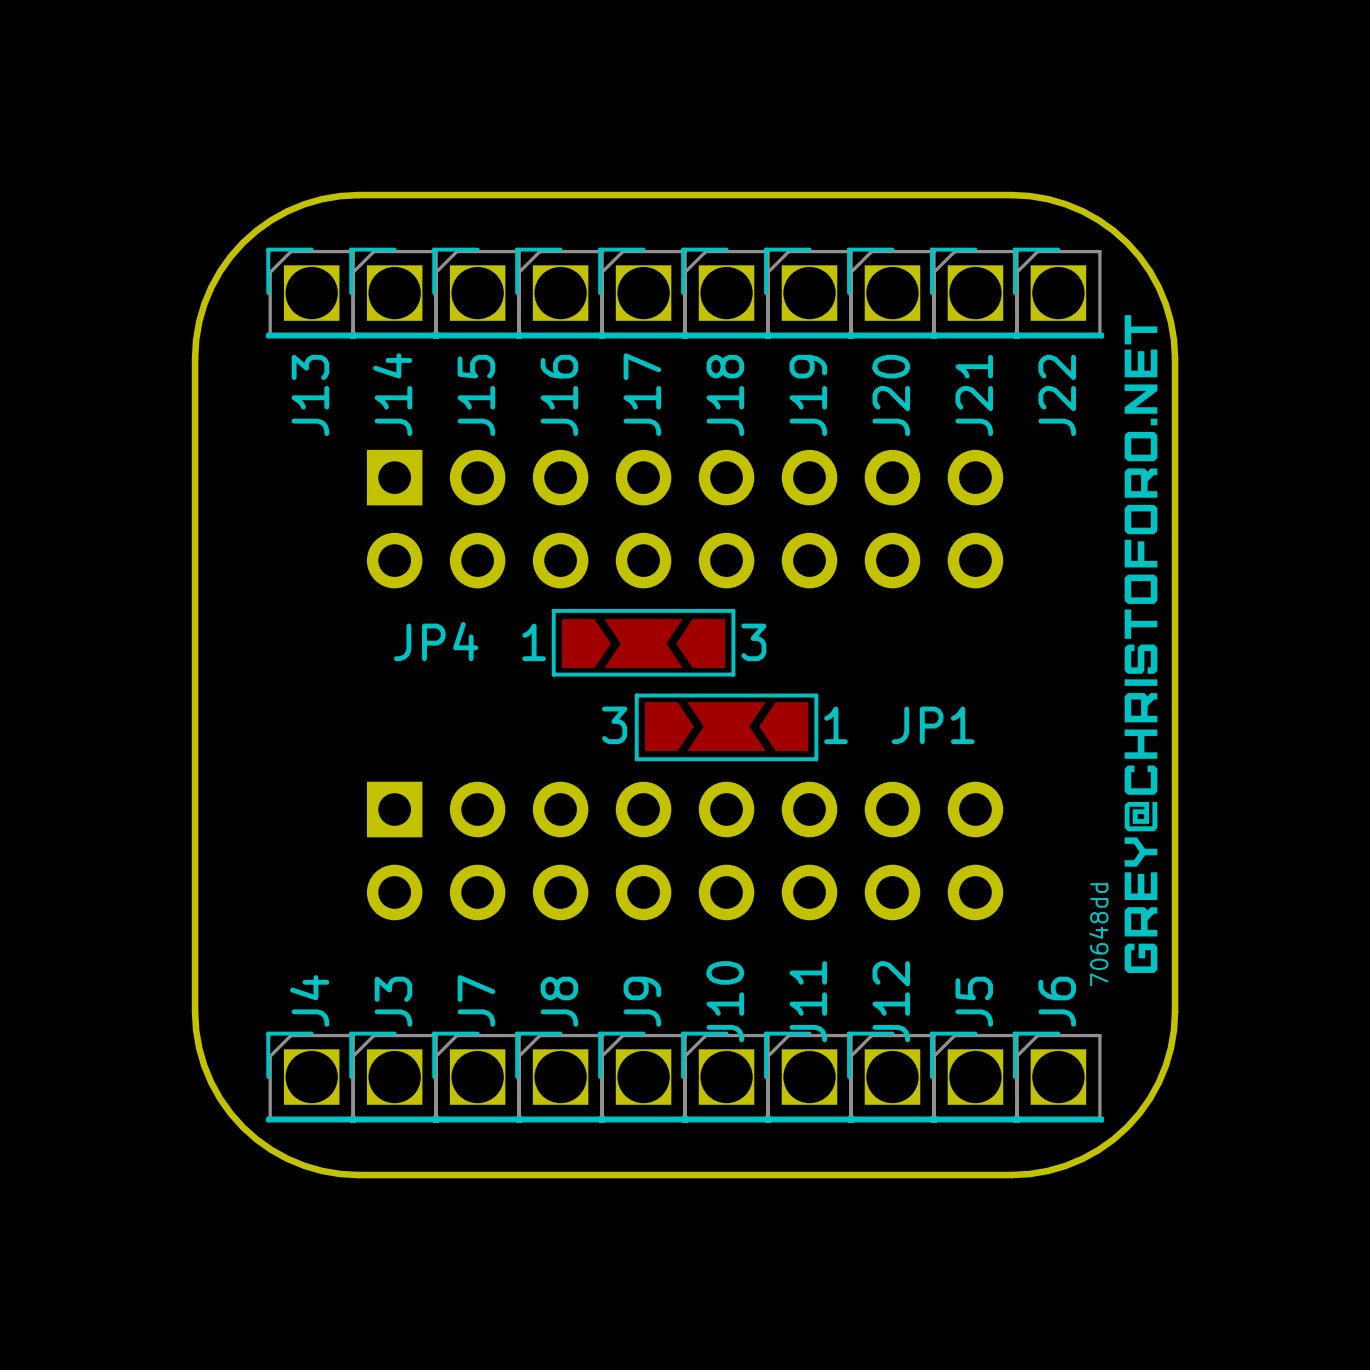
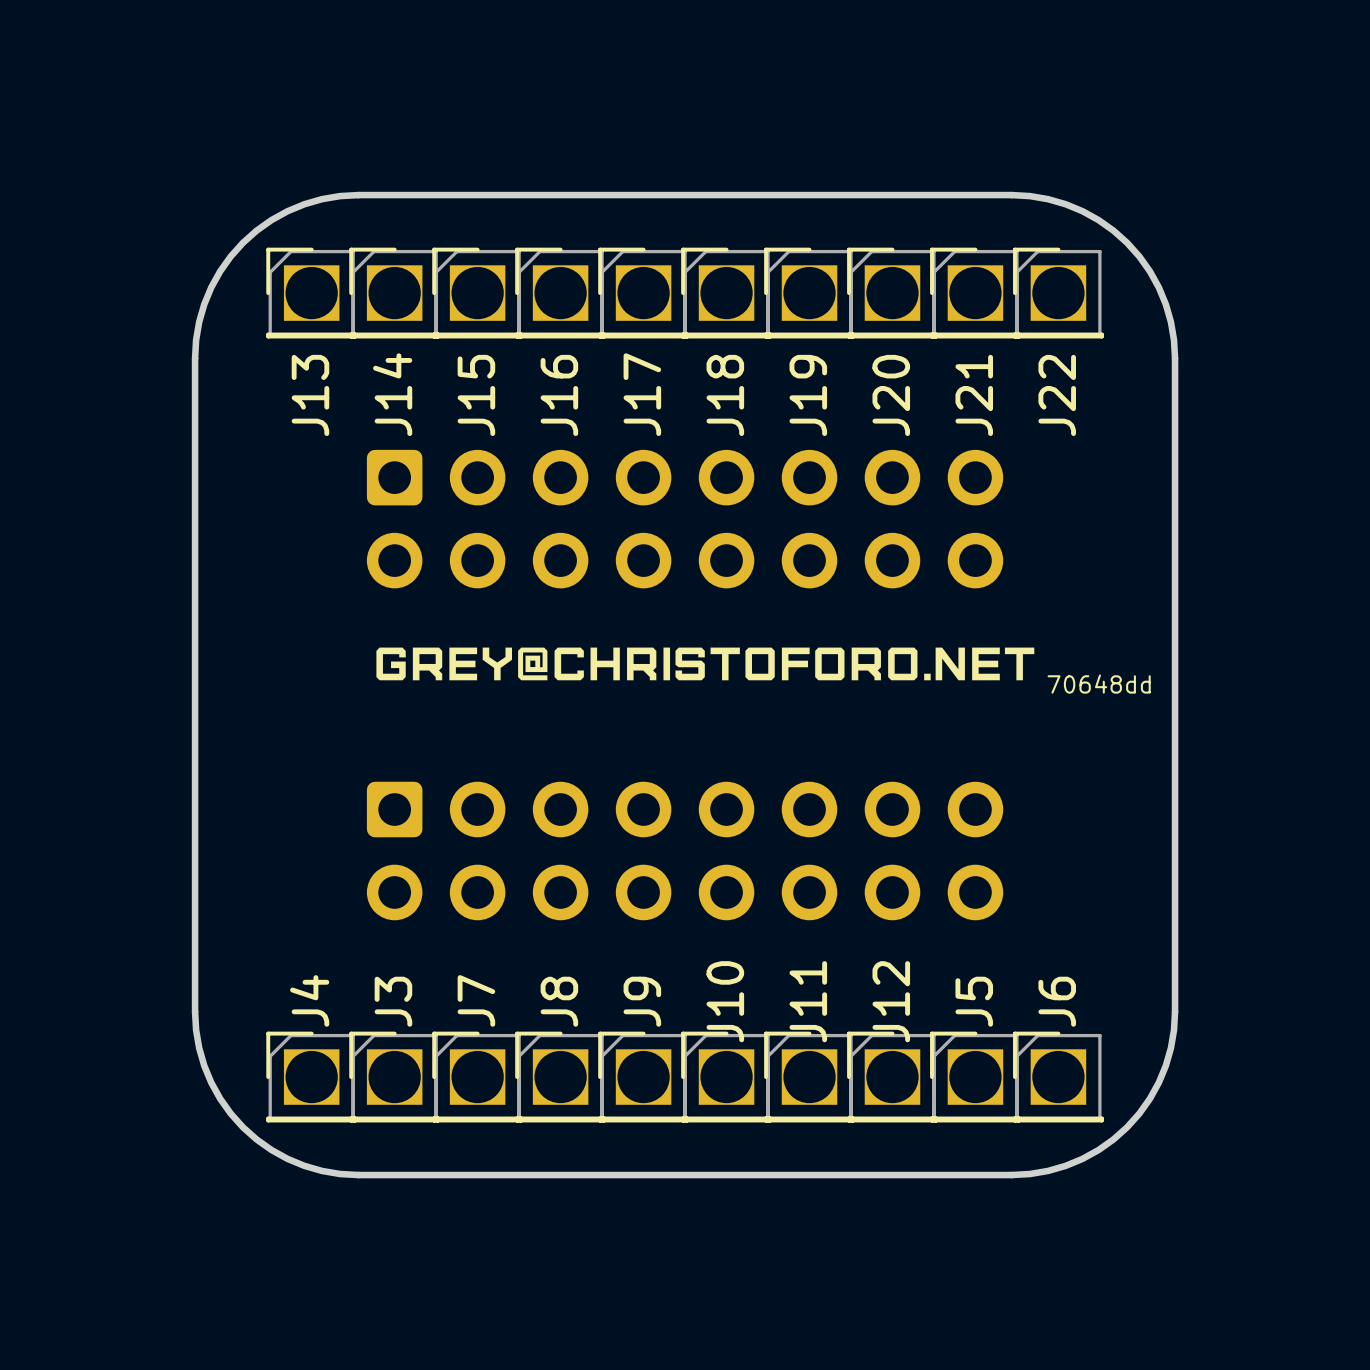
drawing: [1124, 315, 1158, 973] -> none
part footprint: [366, 449, 1004, 589] -> [366, 449, 1004, 589]
JP4: (643, 642) -> none
drawing: none -> [376, 647, 1035, 681]
JP1: (726, 727) -> none
part footprint: [366, 781, 1004, 921] -> [366, 781, 1004, 921]
text rotation: 0° (1098, 934) -> 90° clockwise (1099, 684)
text position: 70648dd (1098, 934) -> 70648dd (1099, 684)

